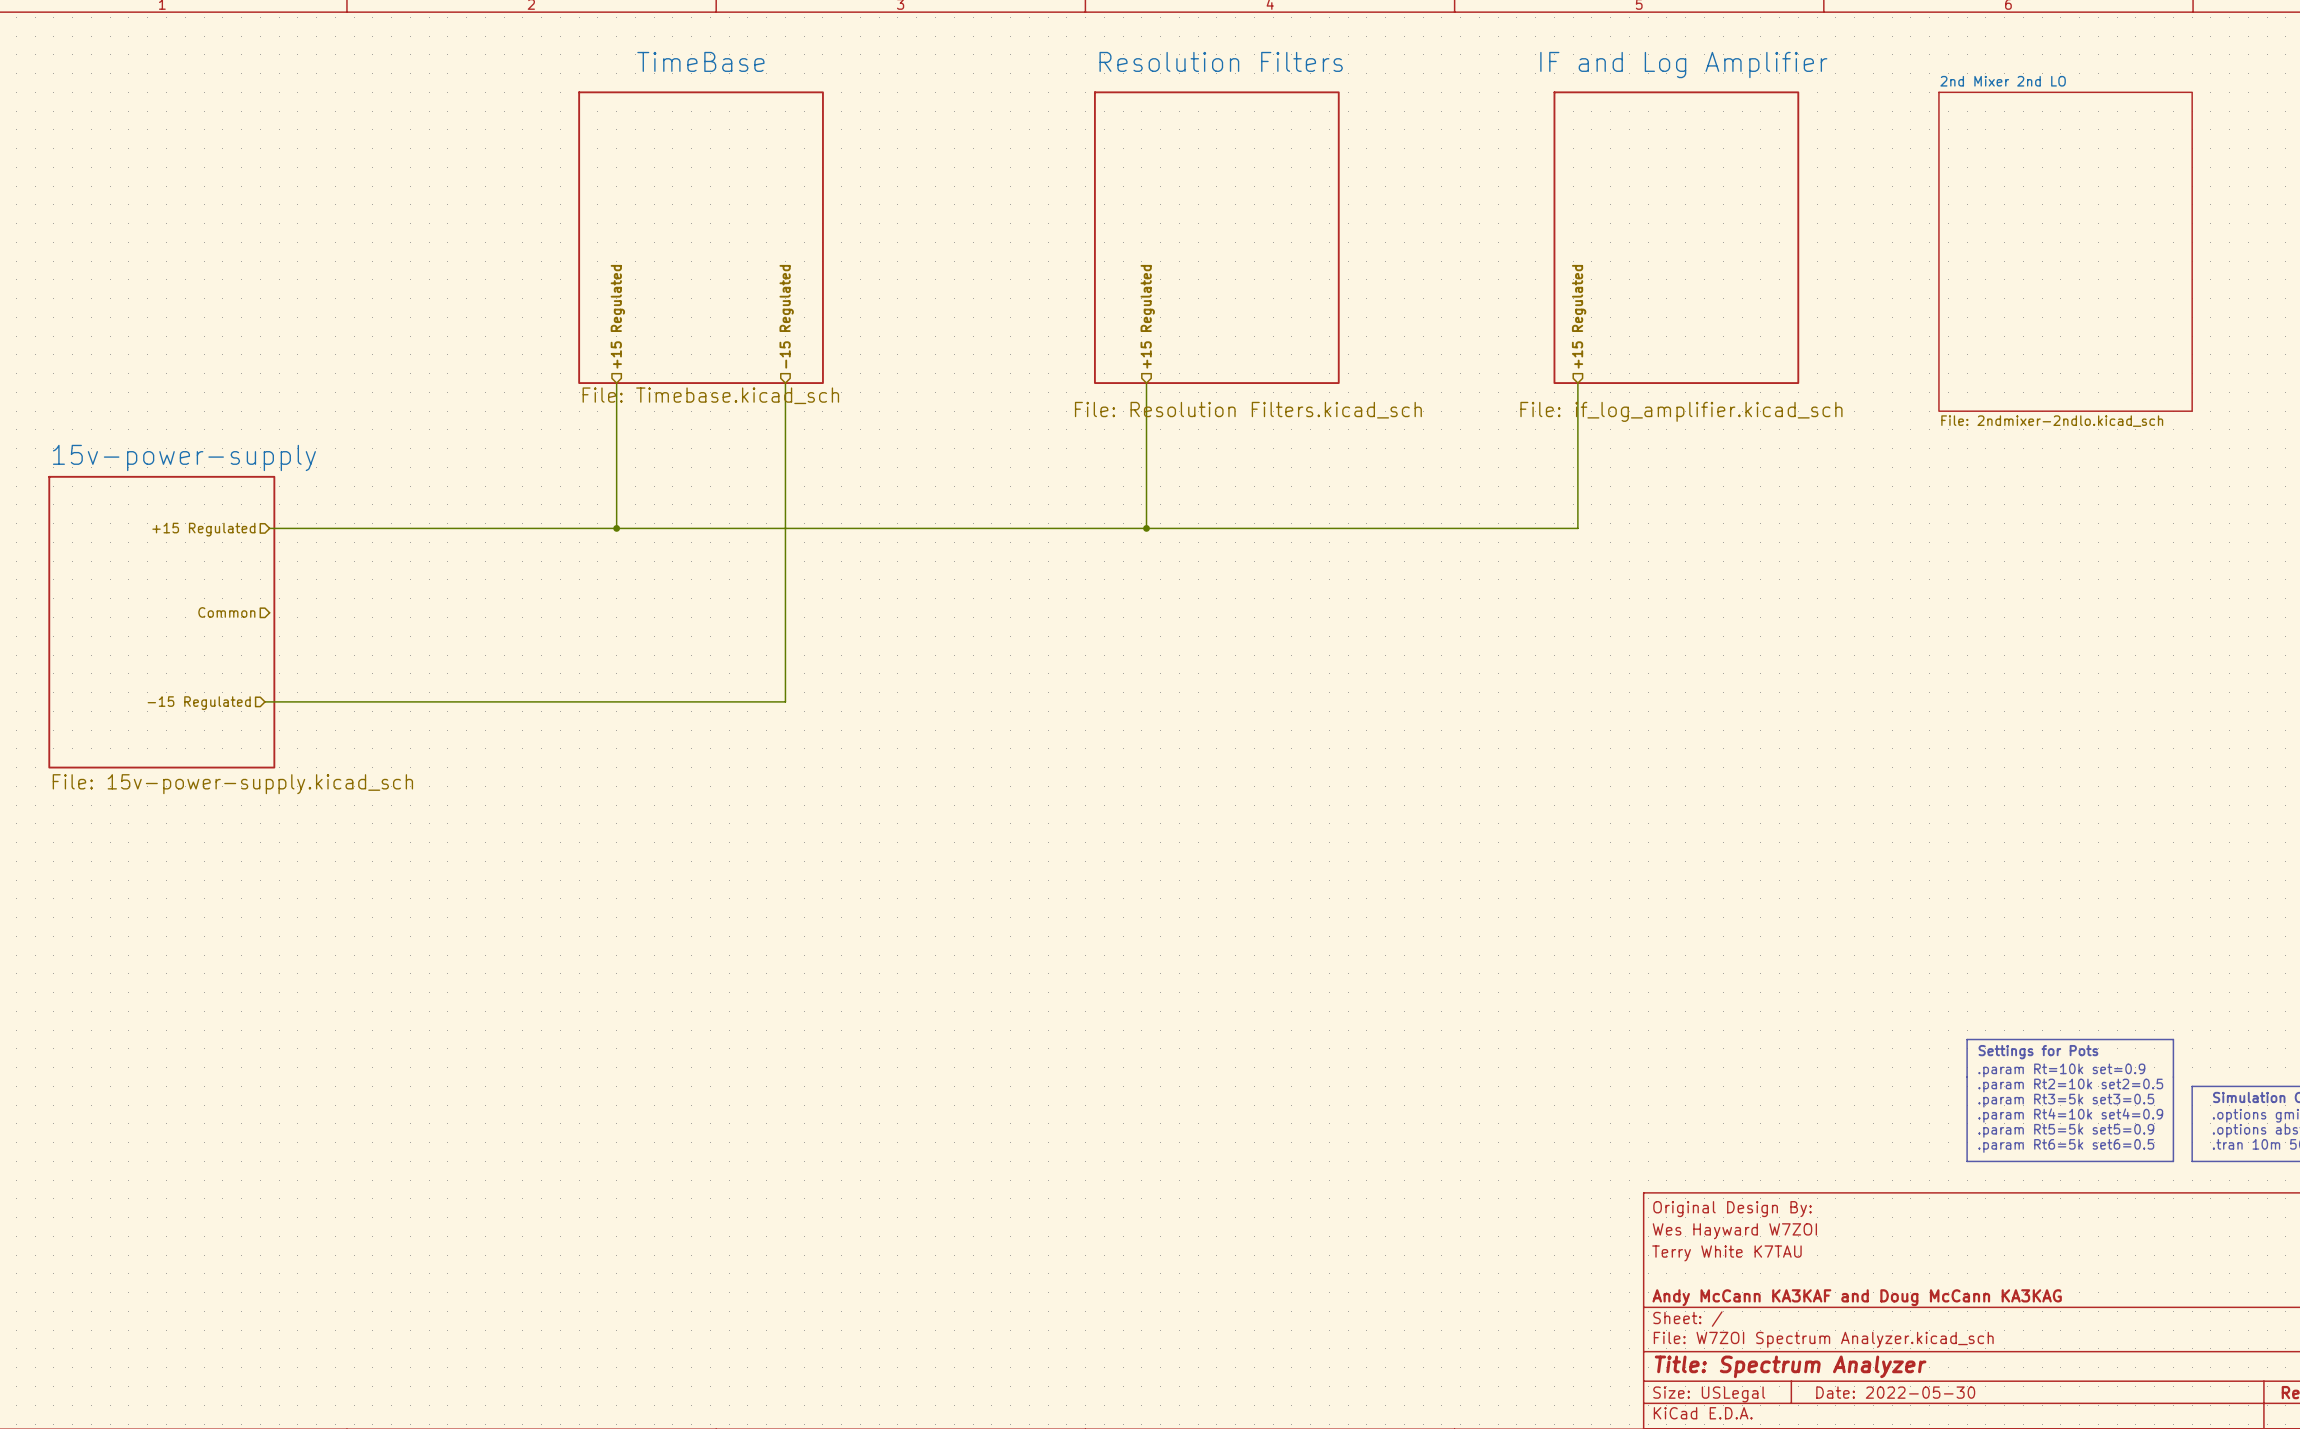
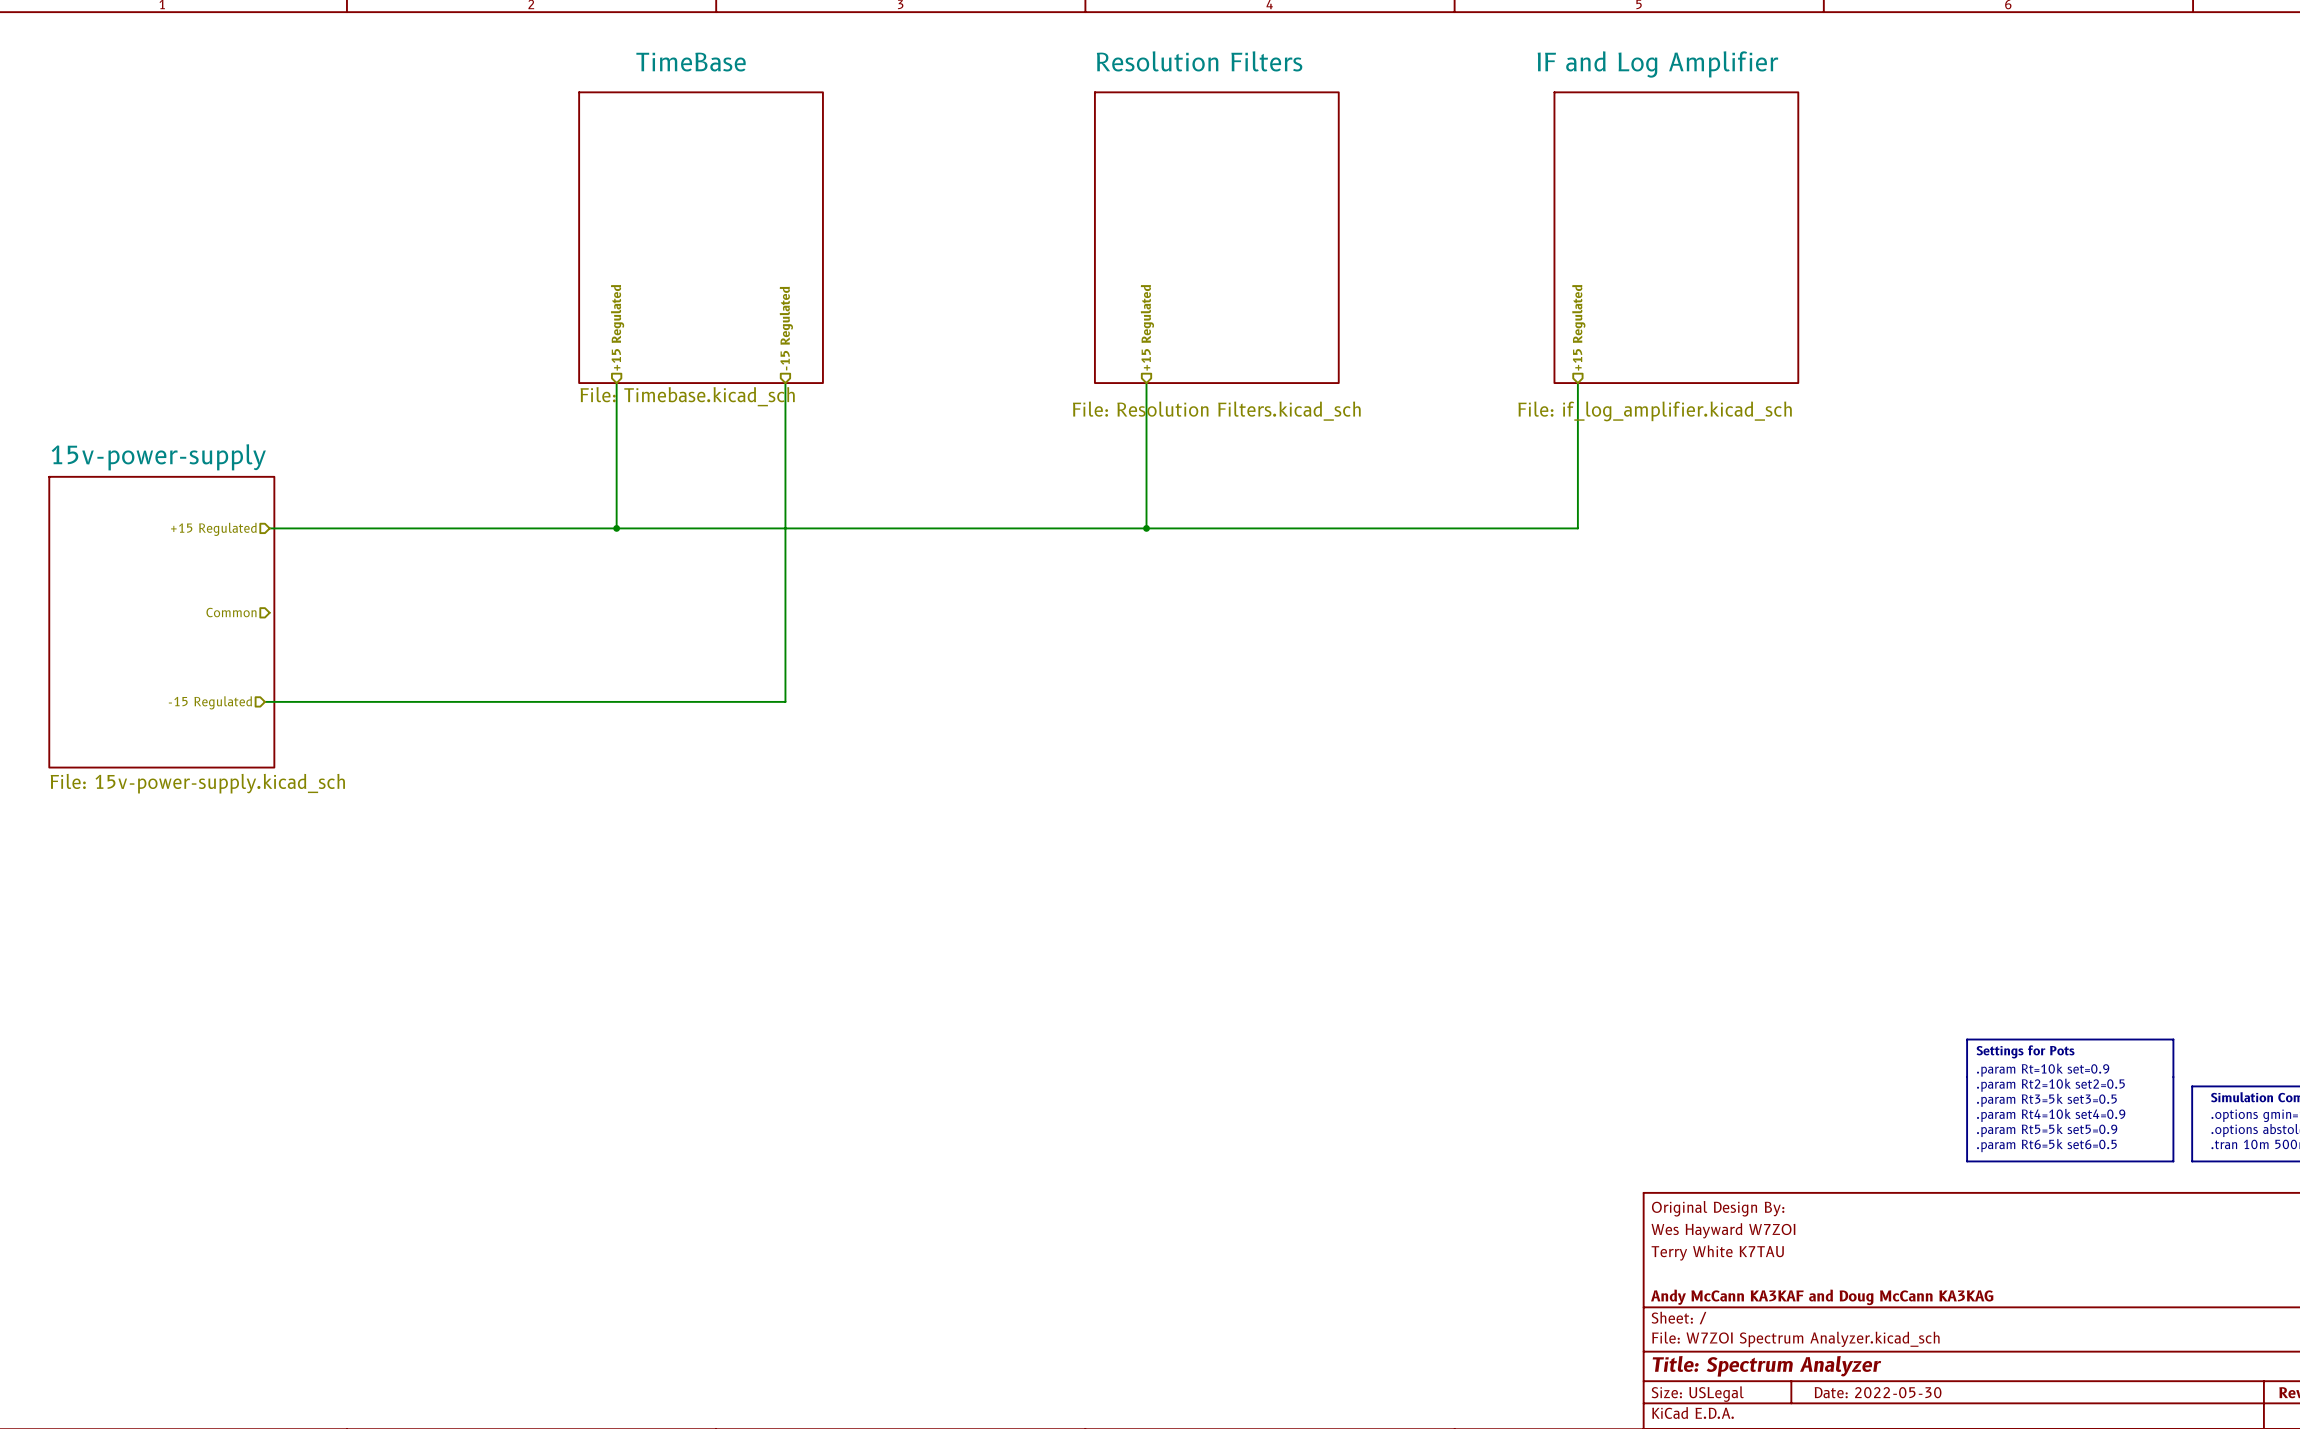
sheet 2nd Mixer 2nd LO: File: 2ndmixer-2ndlo.kicad_sch (2065, 251) -> none

